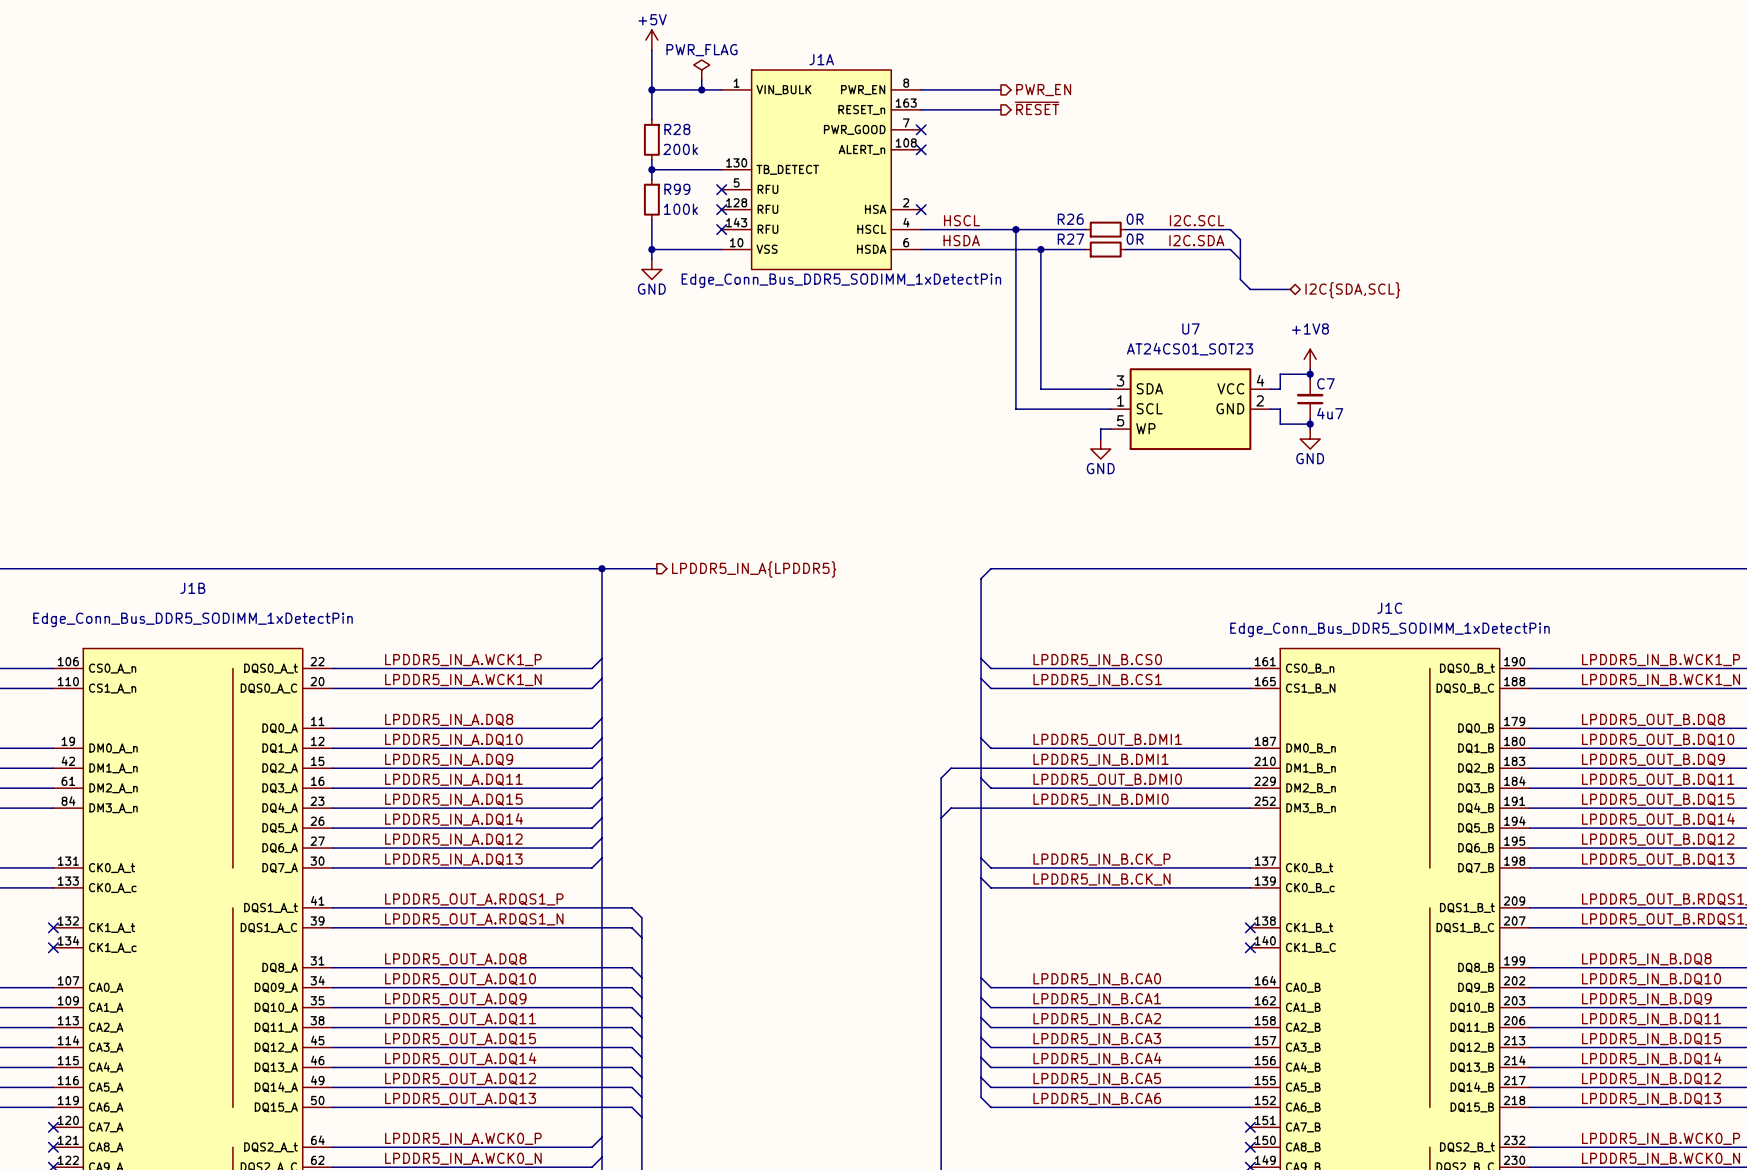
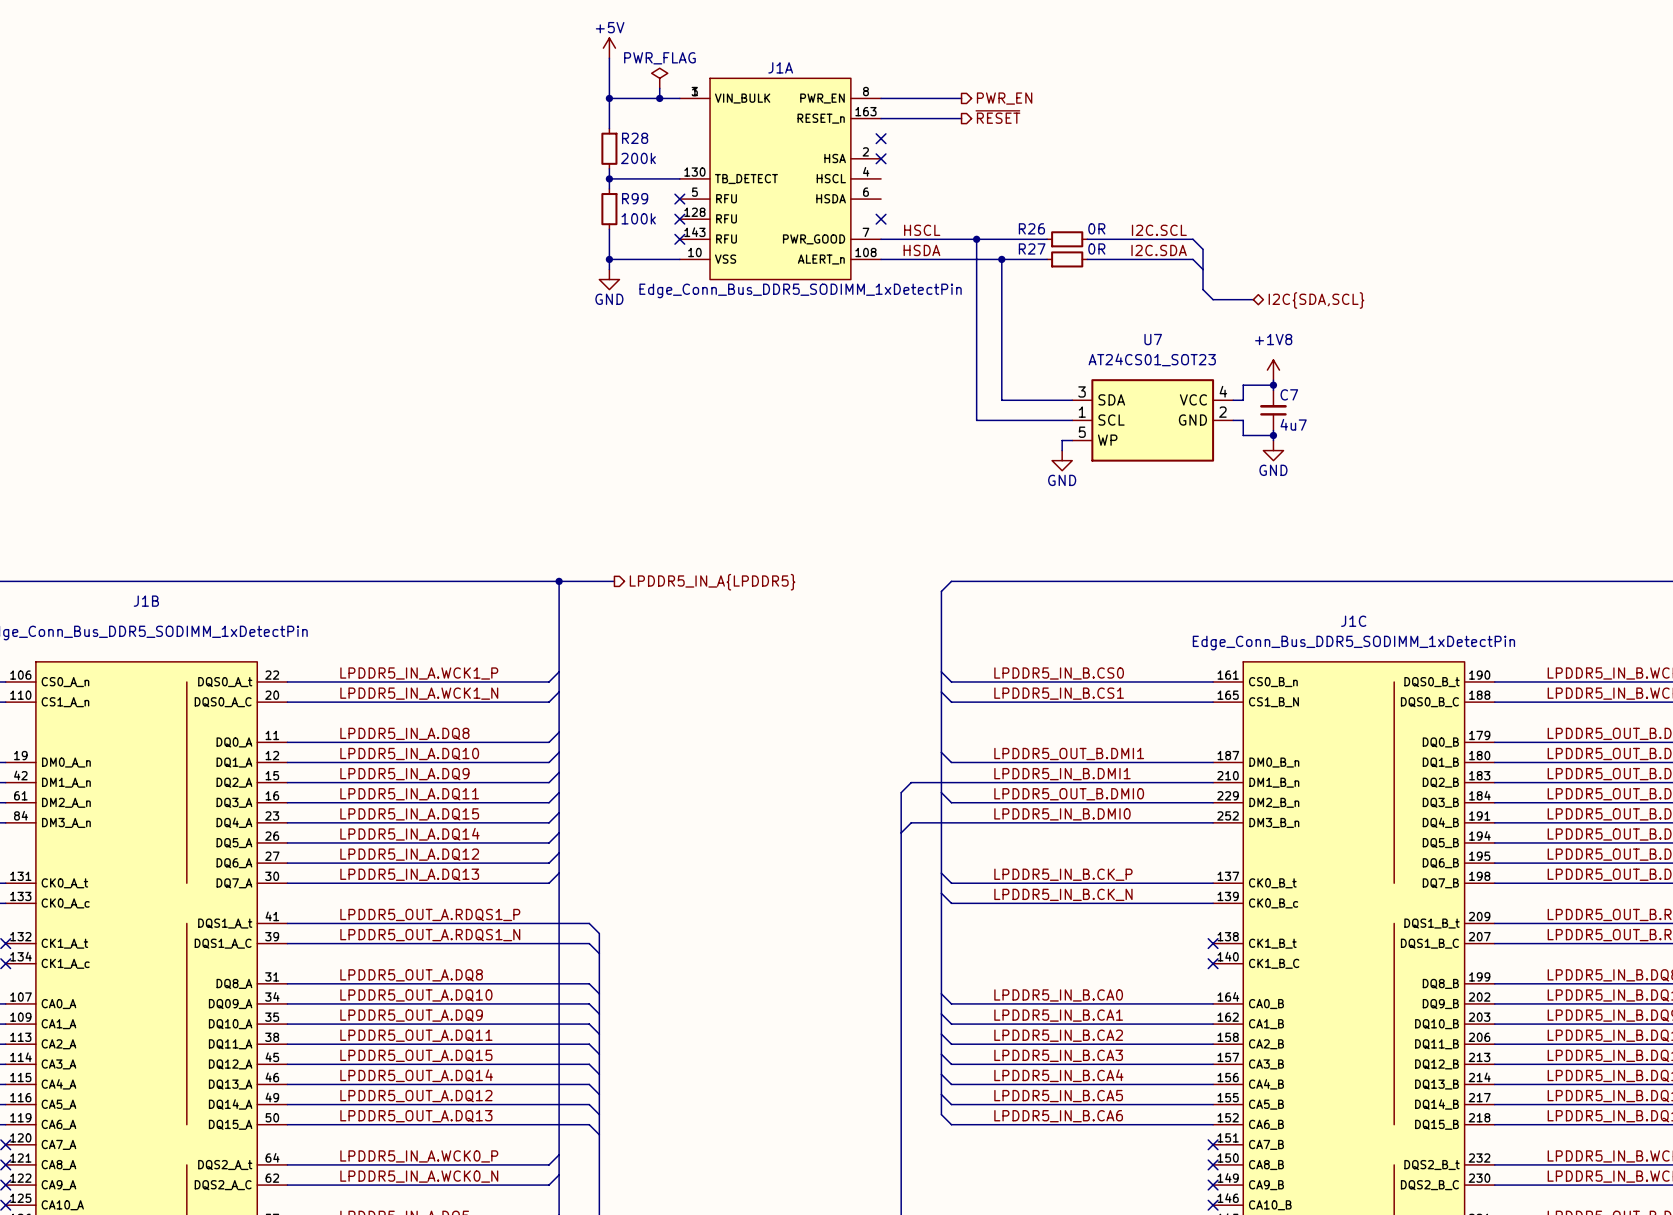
J1A symbol: [721, 70, 922, 270] -> [679, 78, 882, 280]

